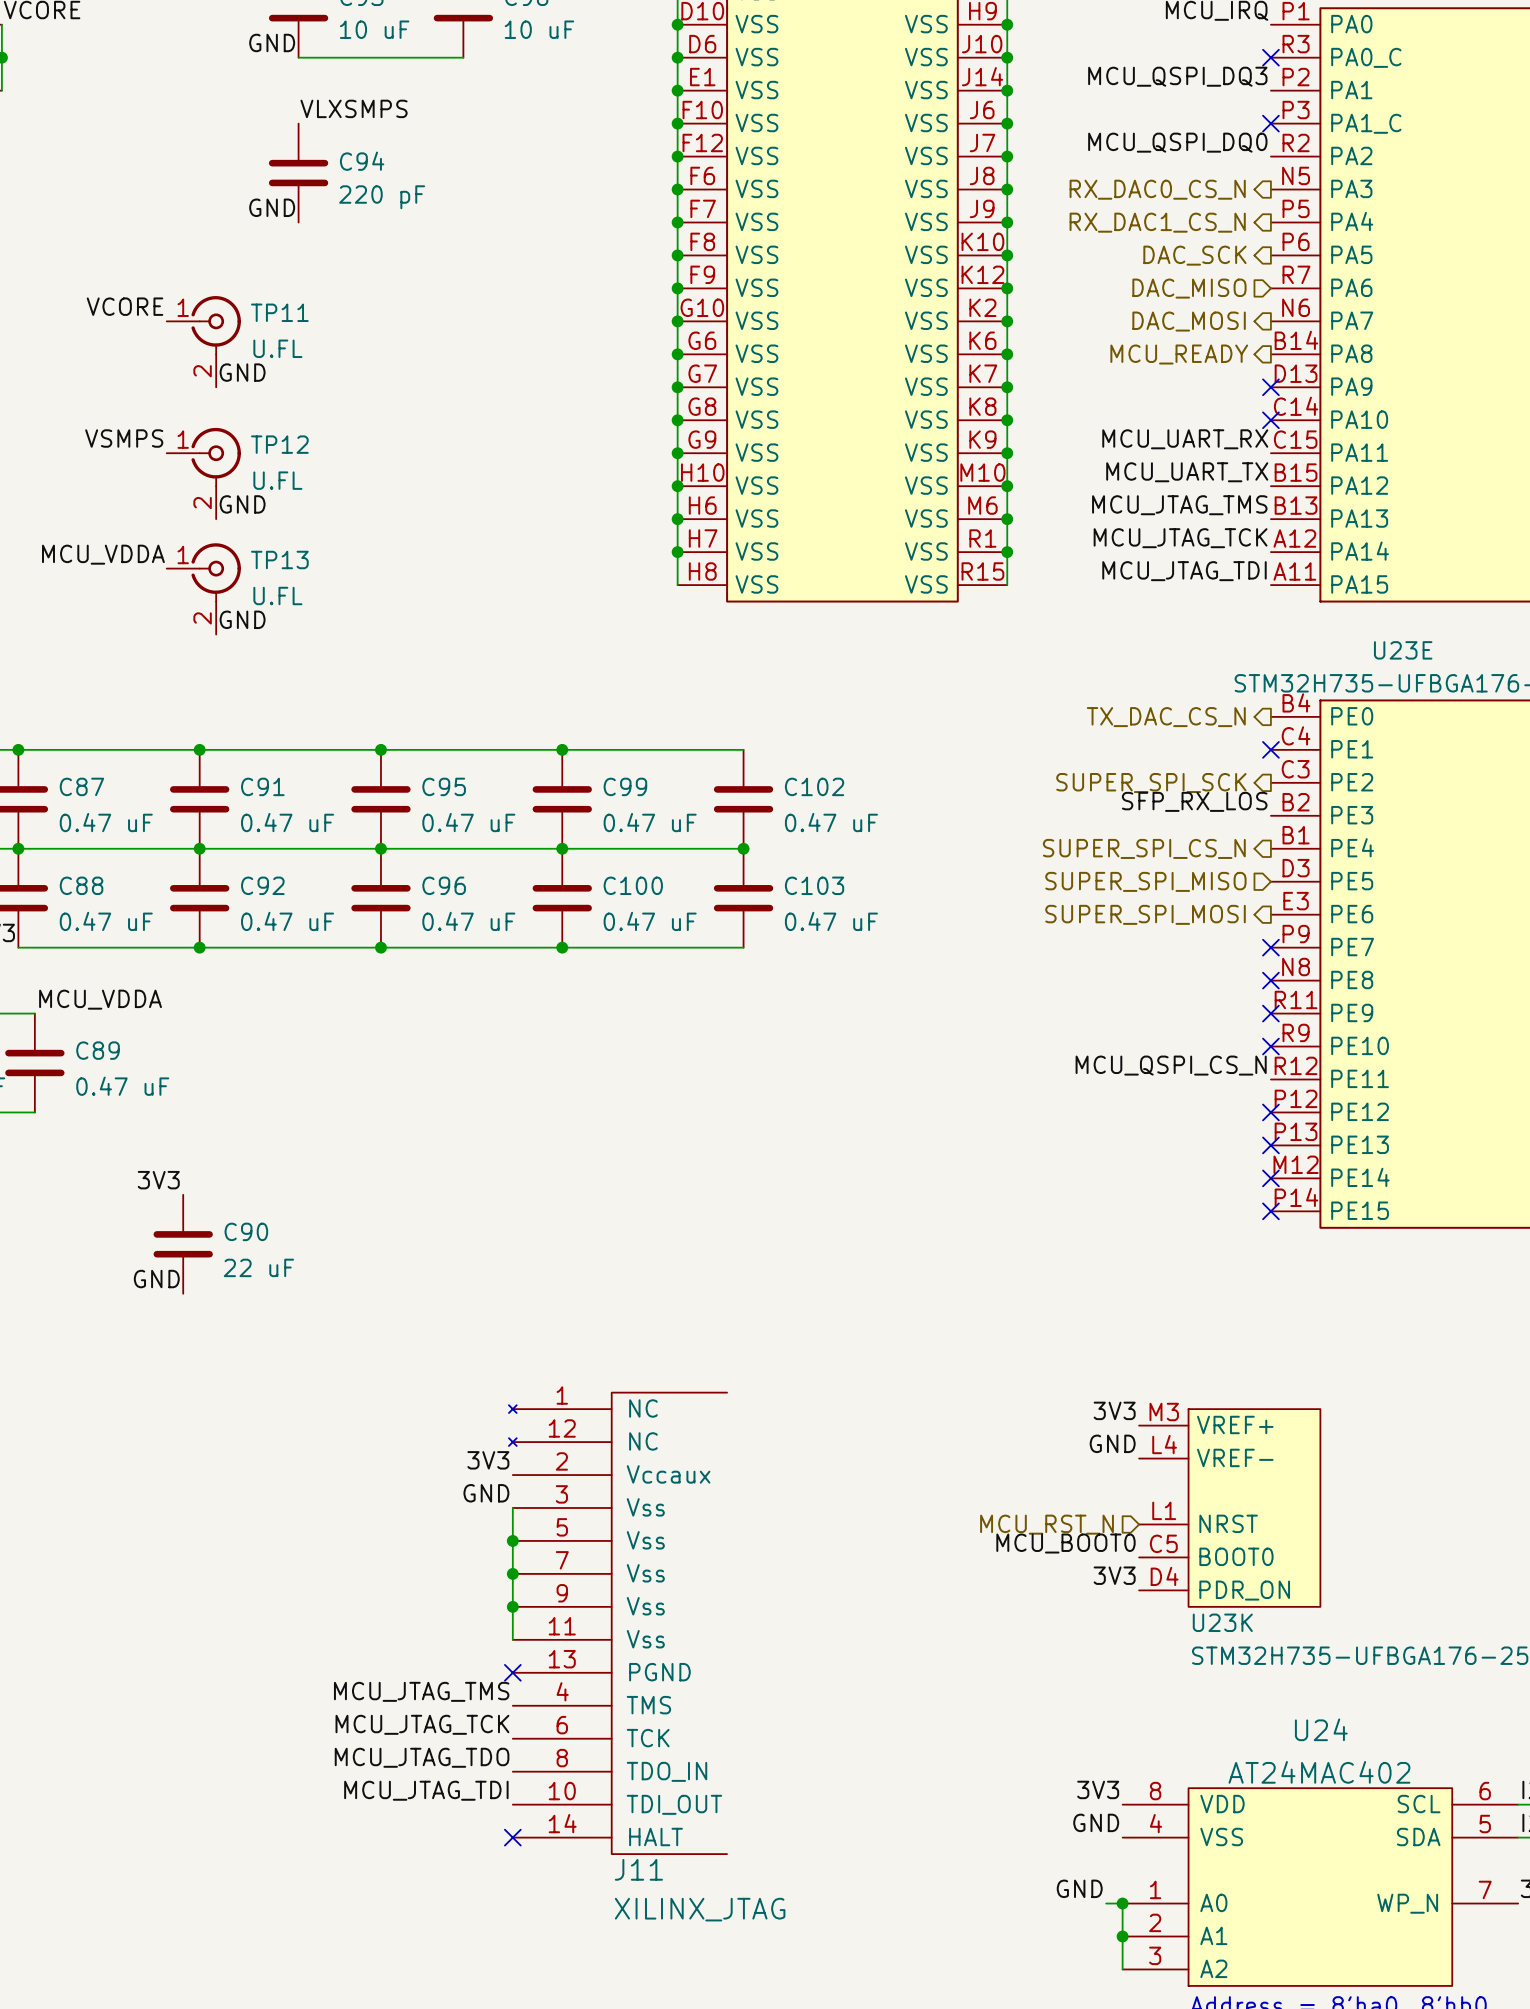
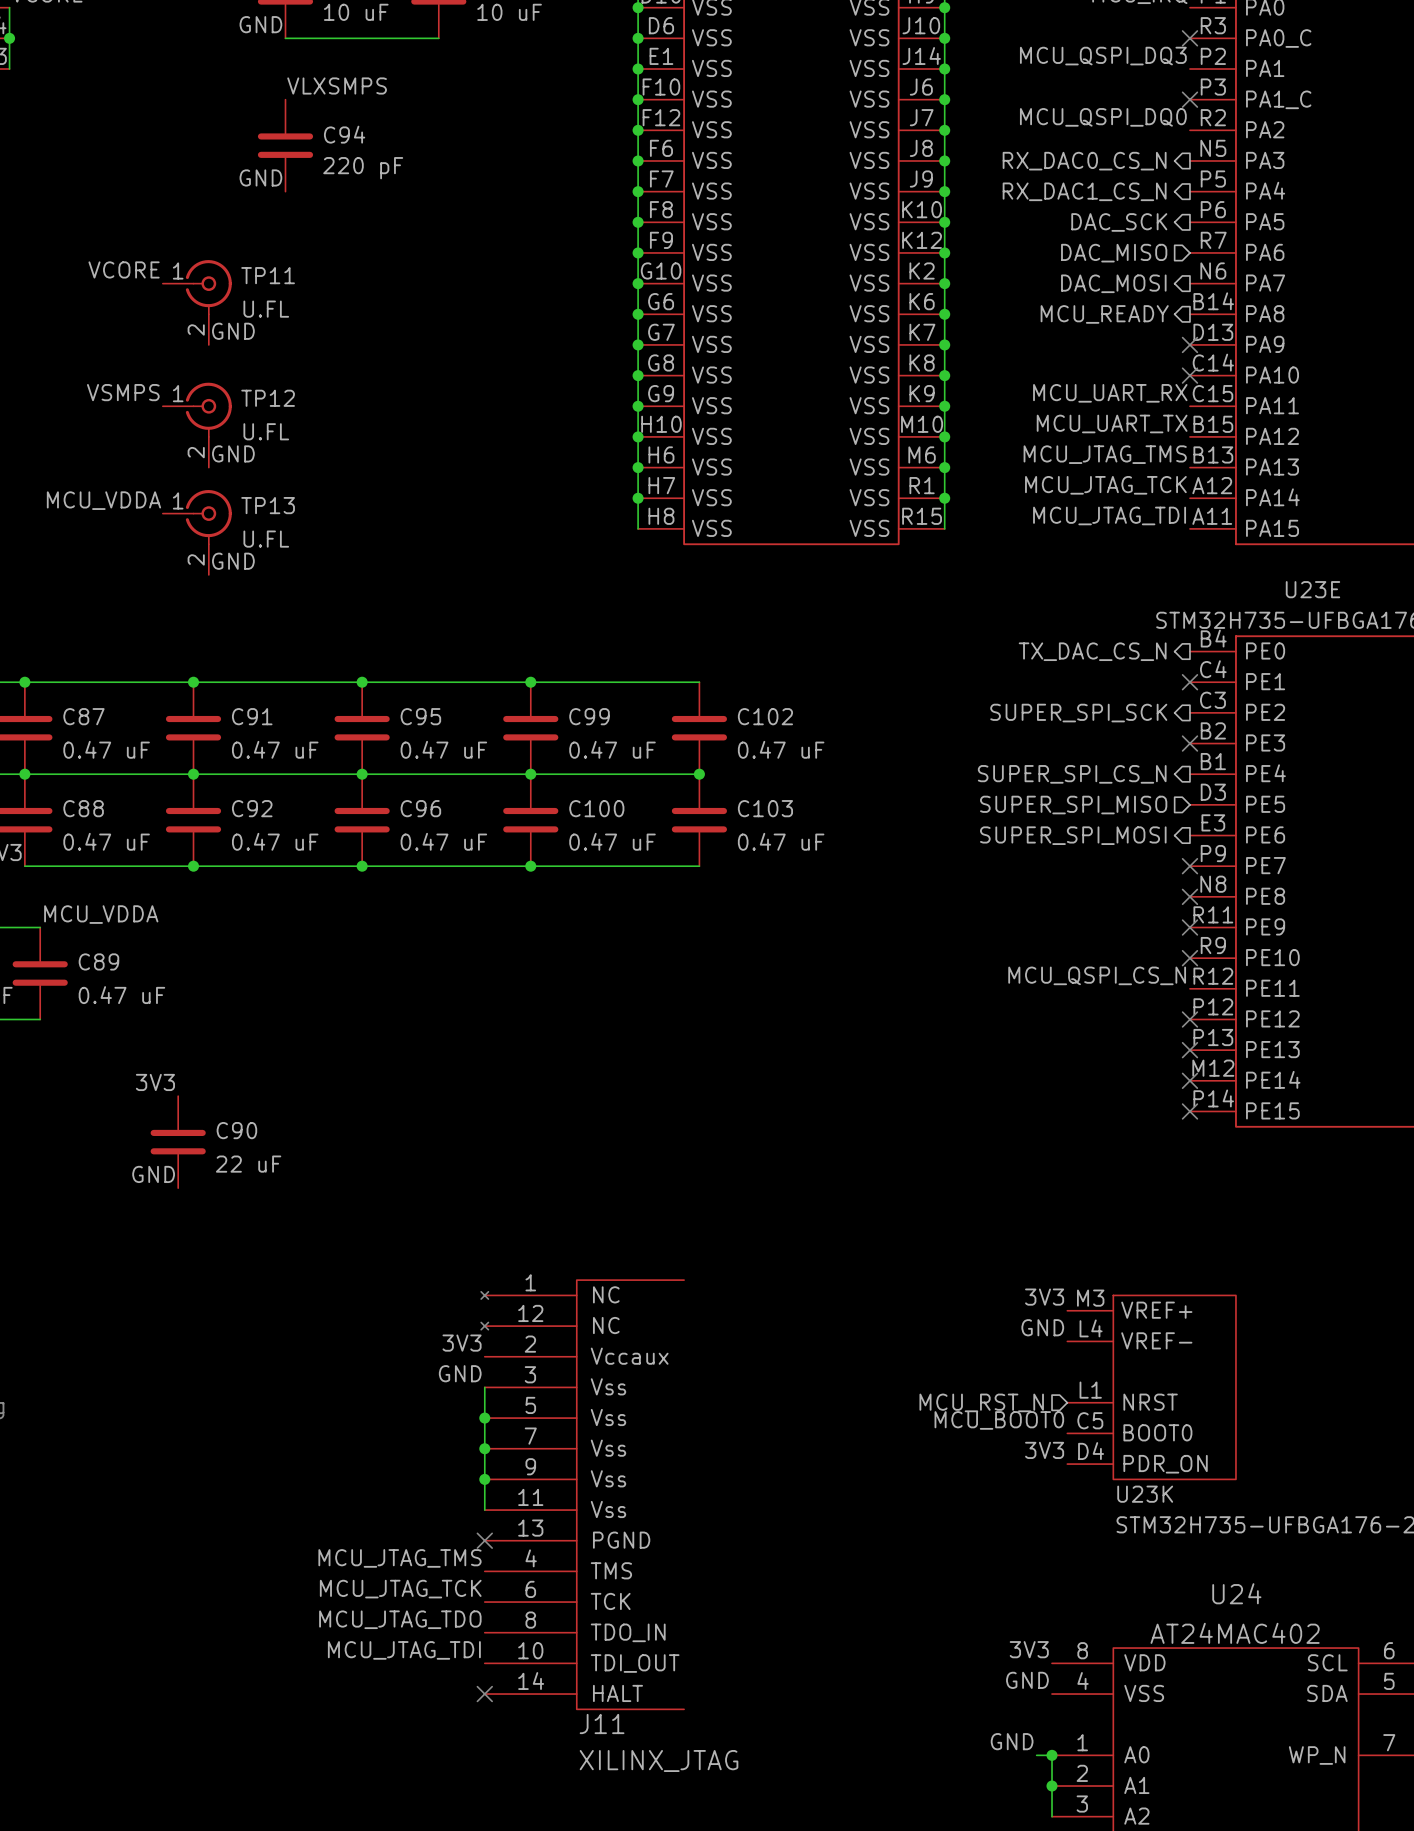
label: SFP_RX_LOS (1194, 801) -> none
no-connect mark: none -> (1189, 743)

